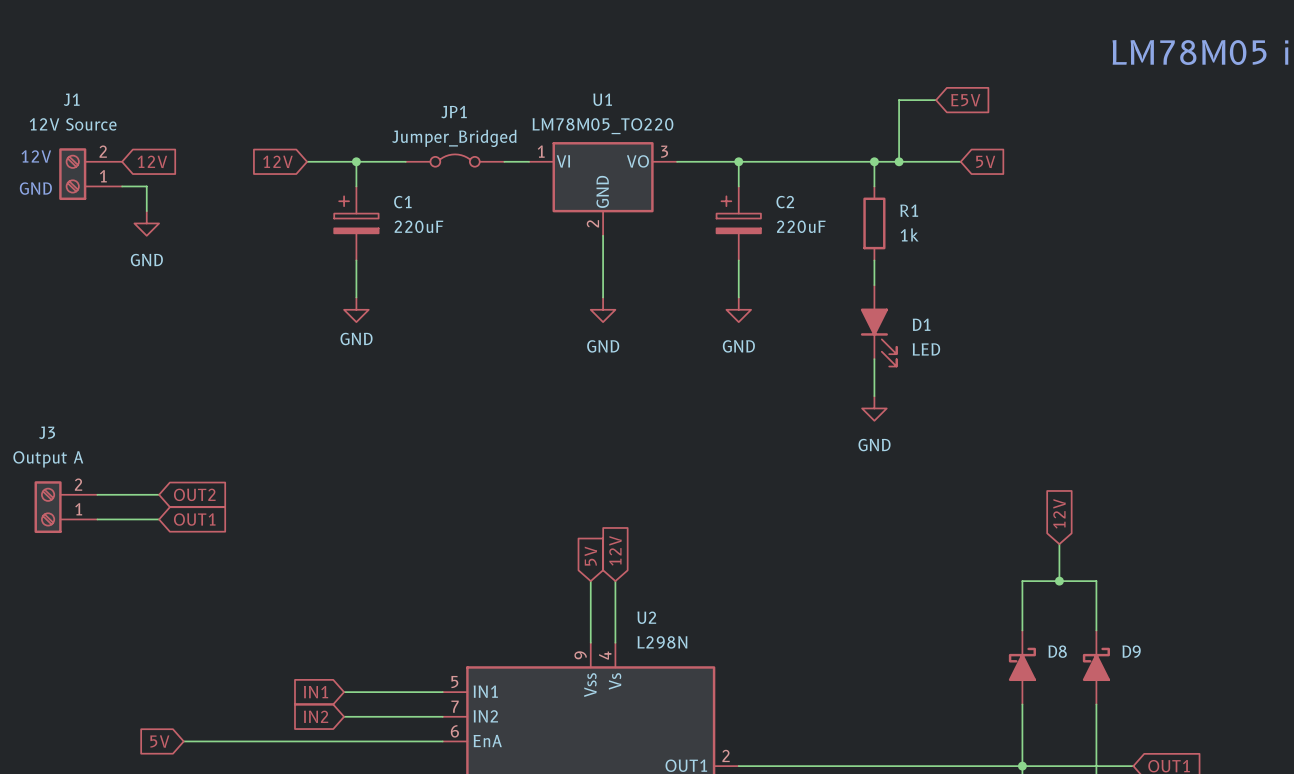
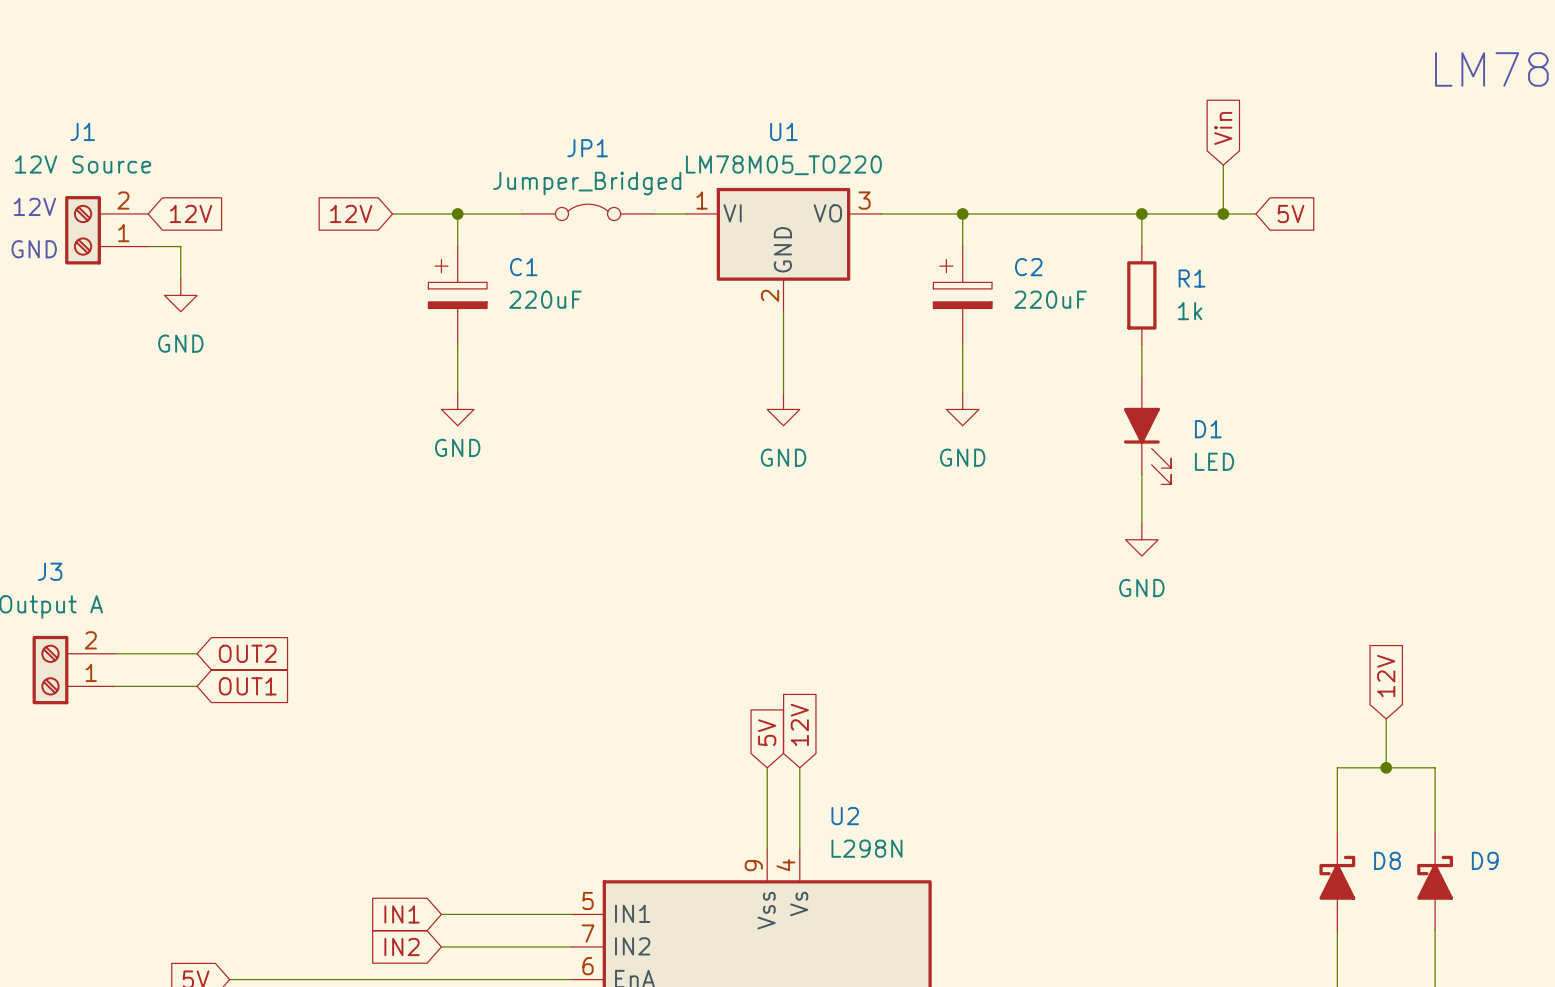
global label: none -> Vin (1223, 128)
wire: (936, 100) (899, 100) (899, 161) -> none
global label: E5V (965, 100) -> none
wire: none -> (1223, 165) (1223, 213)
junction position: (899, 161) -> (1223, 213)

